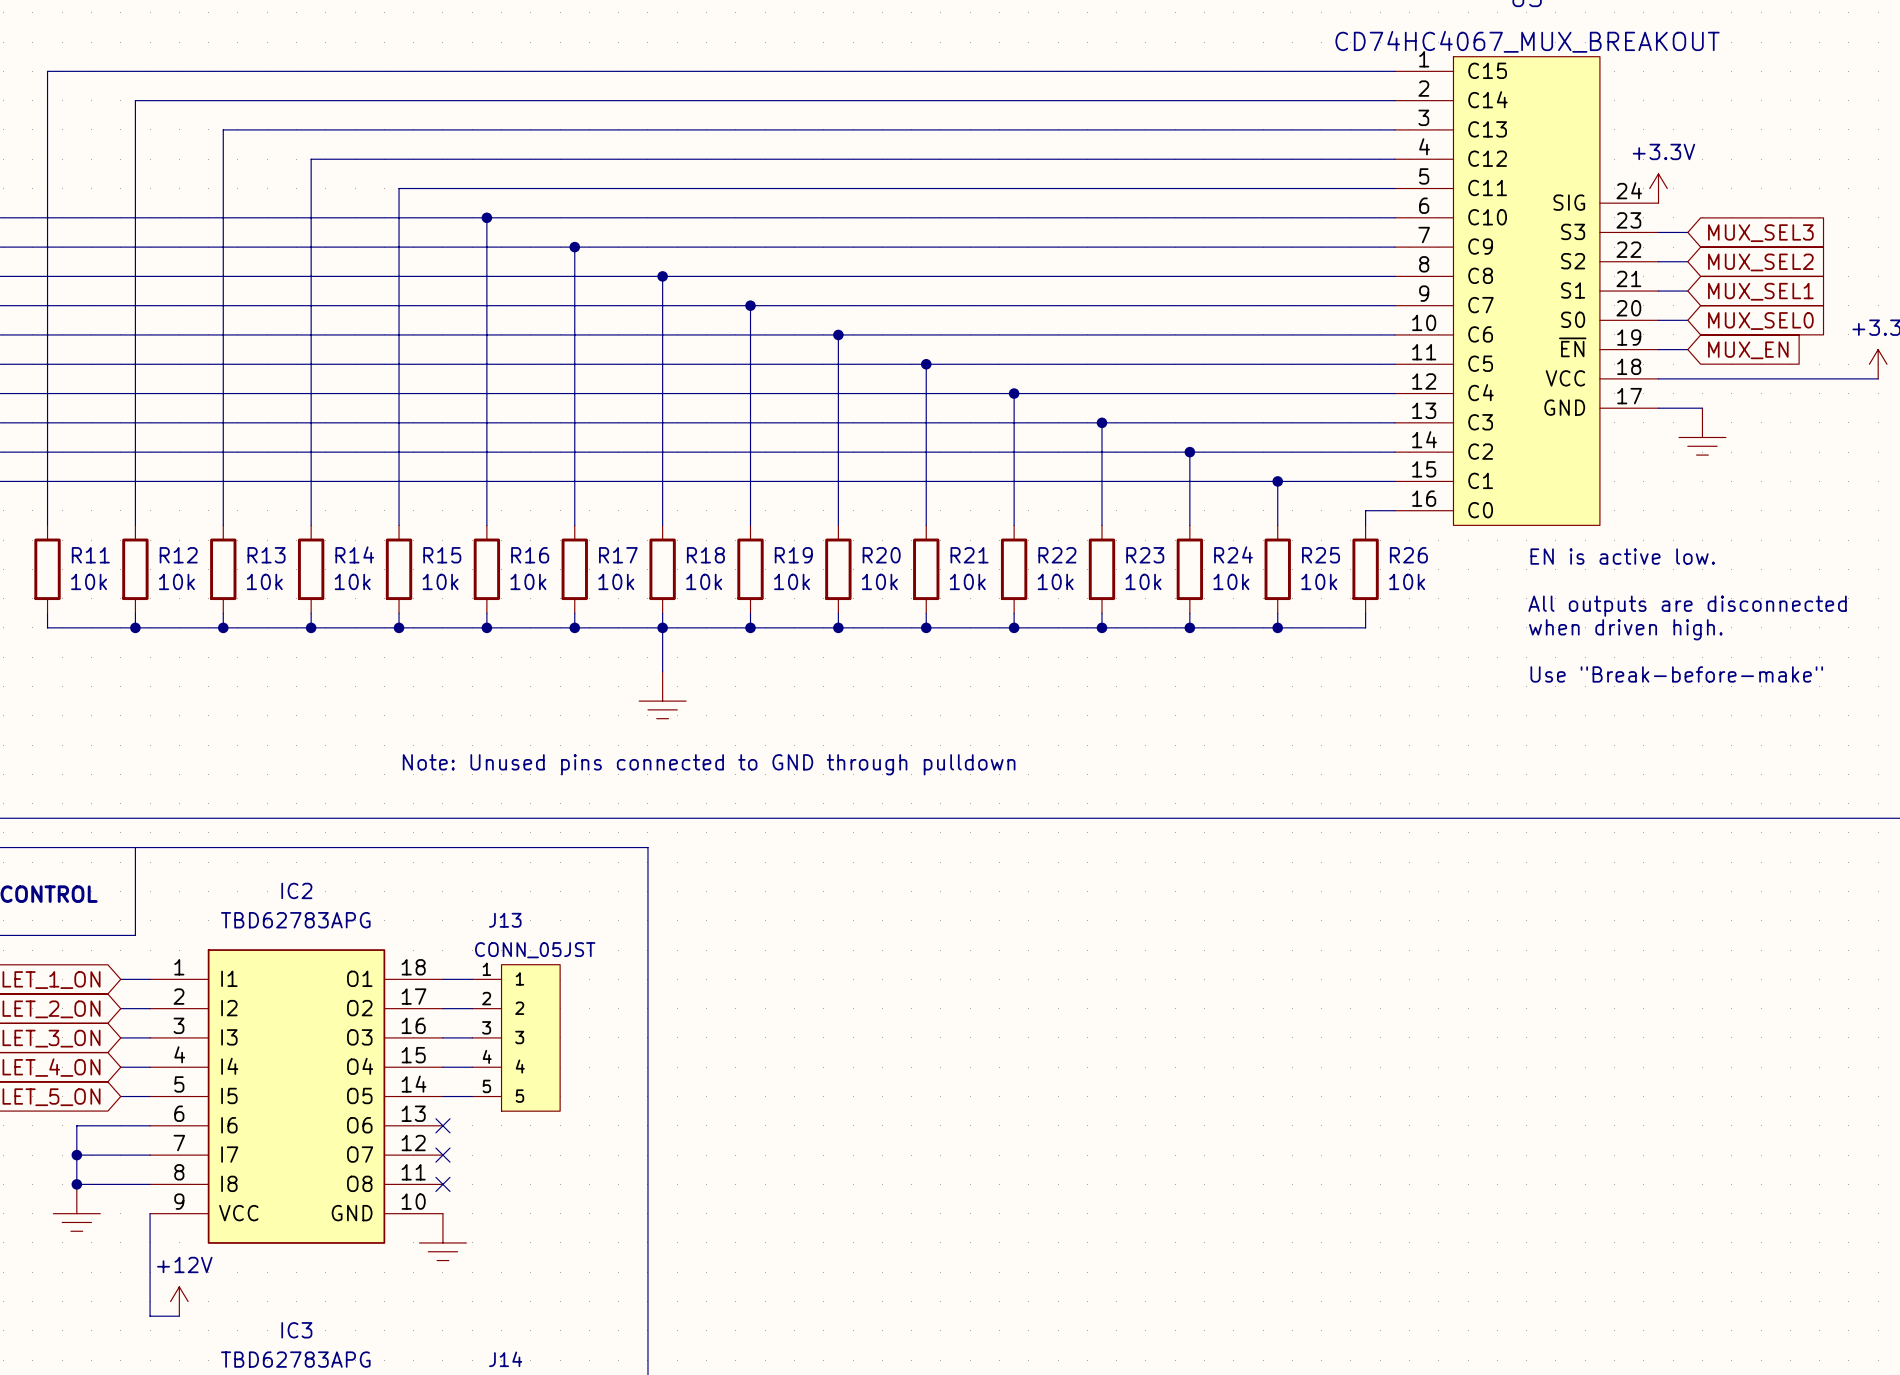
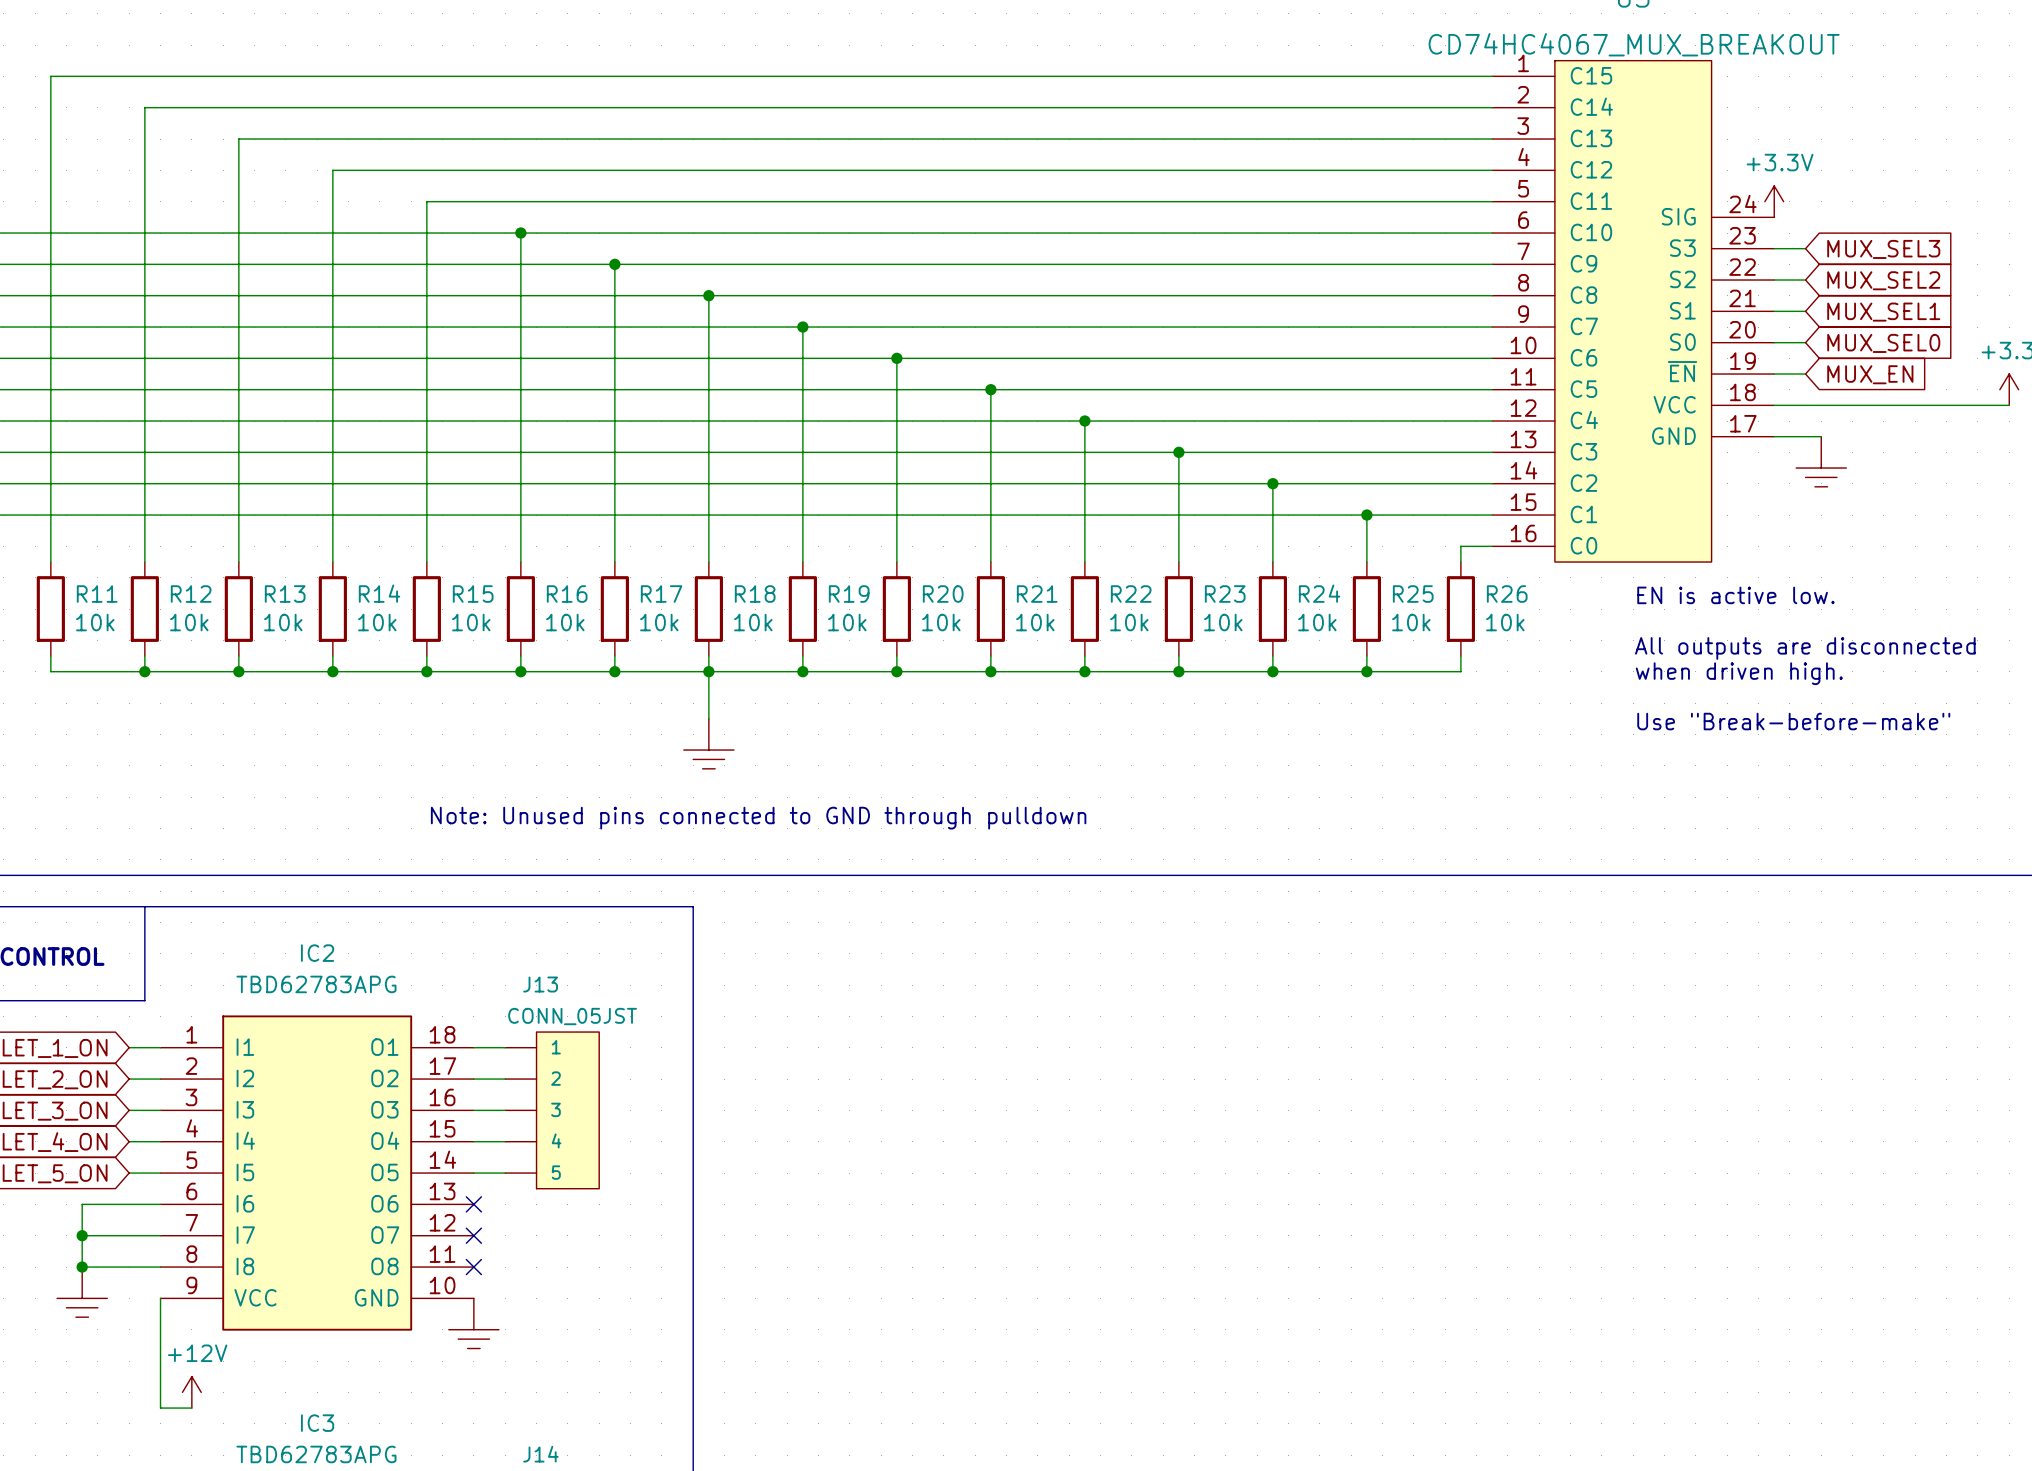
J13 pin number: 1 (486, 969) -> none
J13 pin number: 2 (486, 998) -> none
J13 pin number: 3 (486, 1027) -> none
J13 pin number: 4 (487, 1056) -> none
J13 pin number: 5 (486, 1086) -> none

